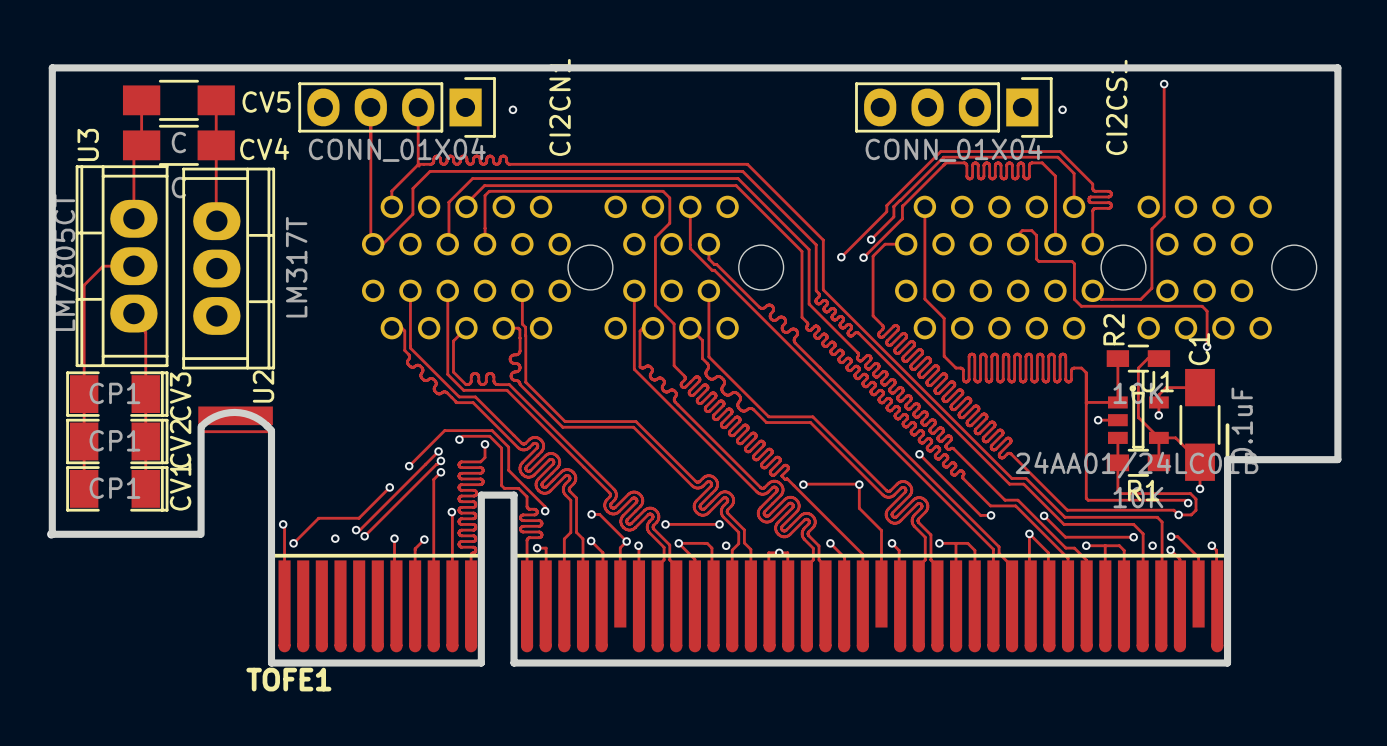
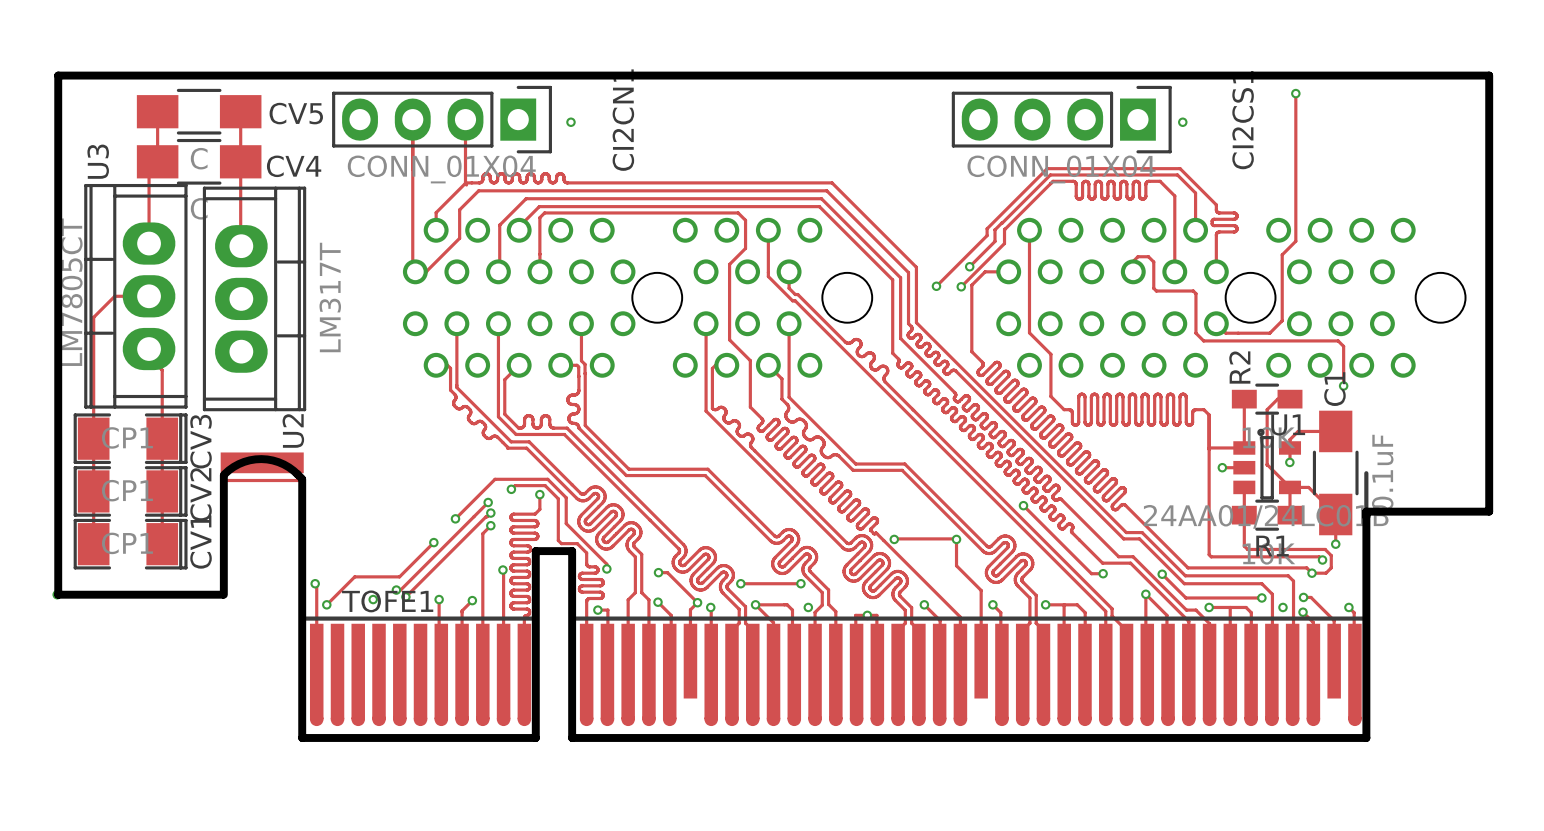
TOFE1 name position: TOFE1 (288, 679) -> TOFE1 (387, 601)

